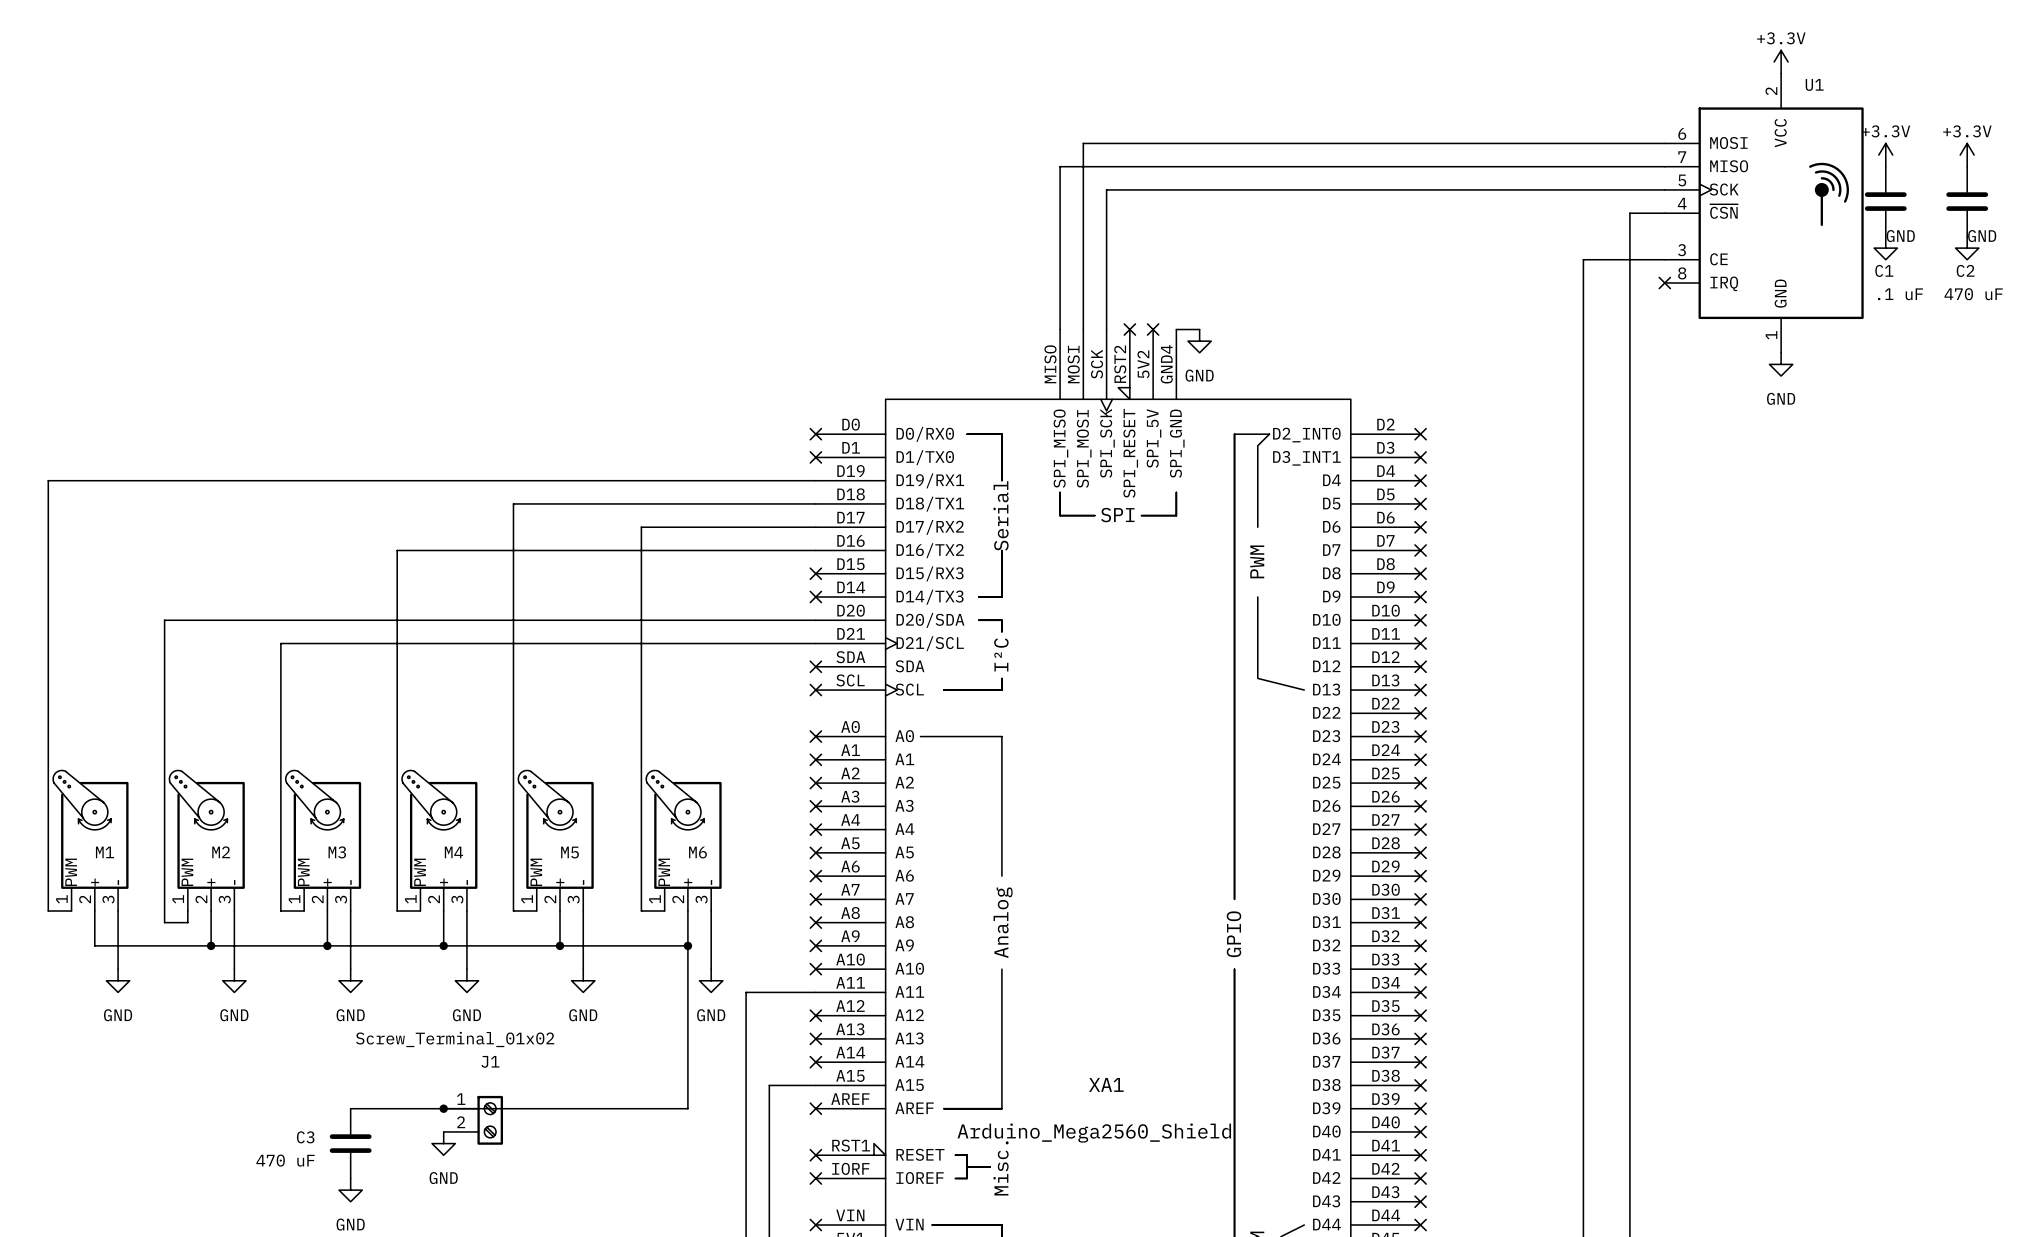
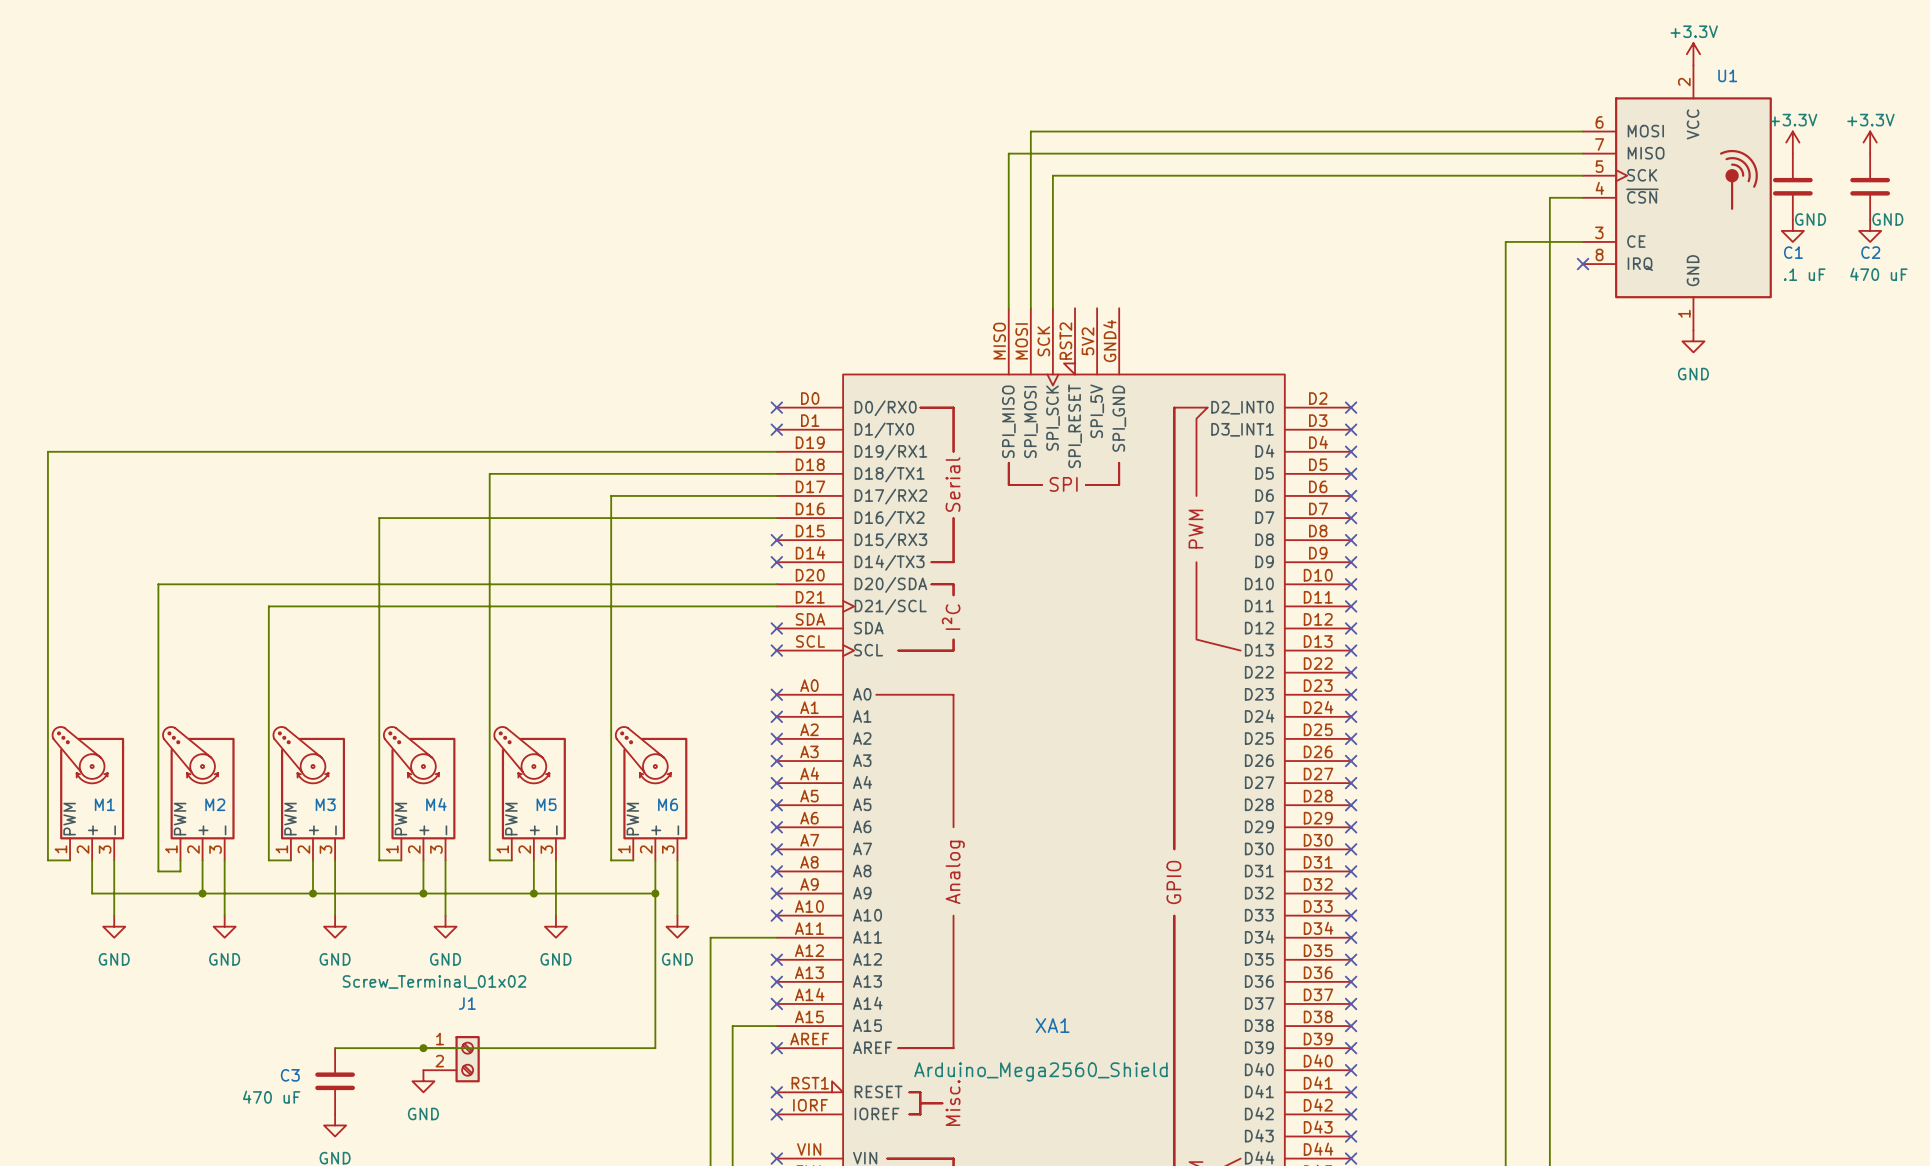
no-connect mark: (1129, 329) -> none
no-connect mark: (1153, 329) -> none
wire: (1176, 329) (1199, 329) -> none
power symbol: GND (1199, 341) -> none

